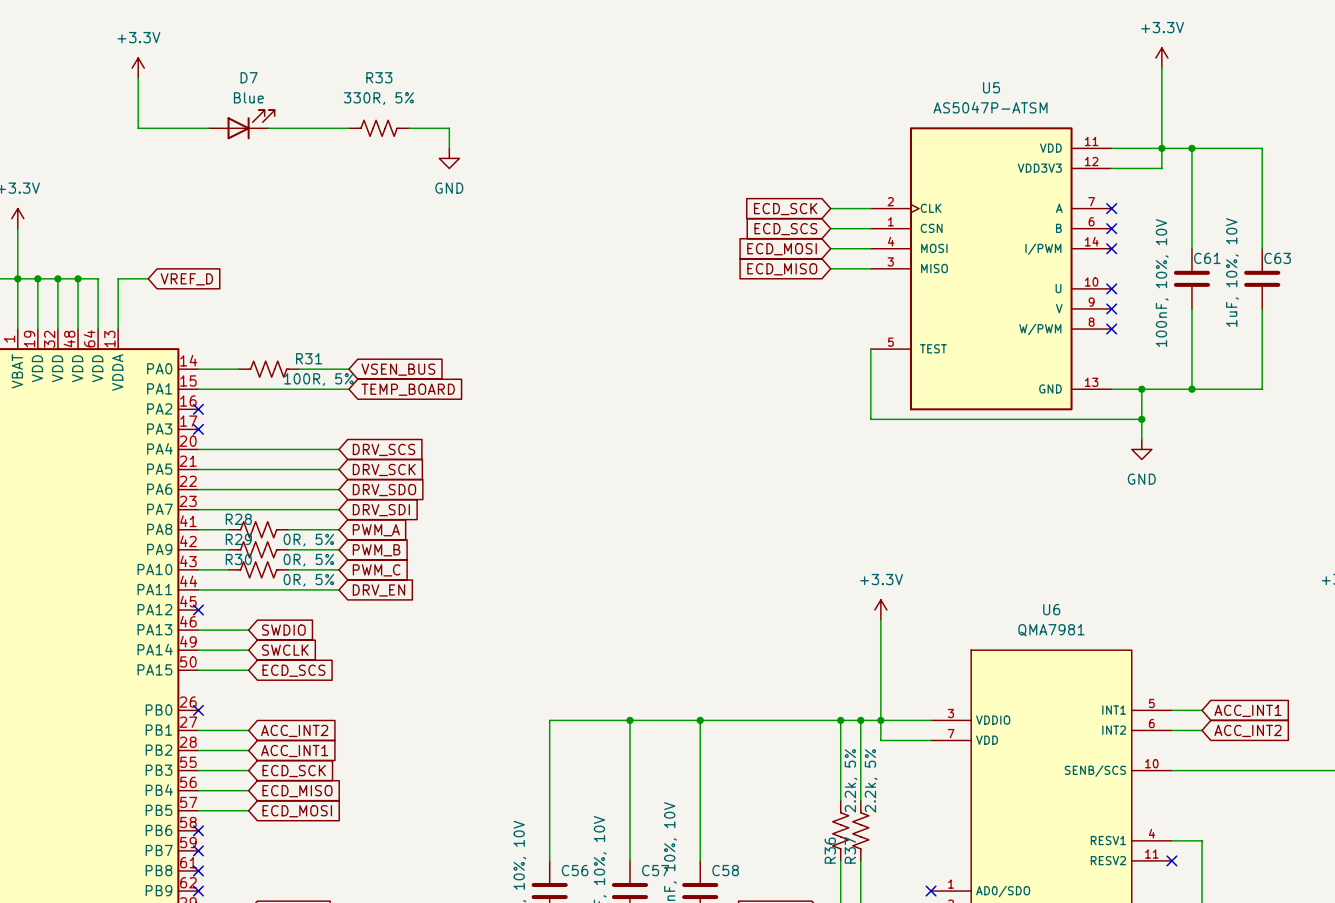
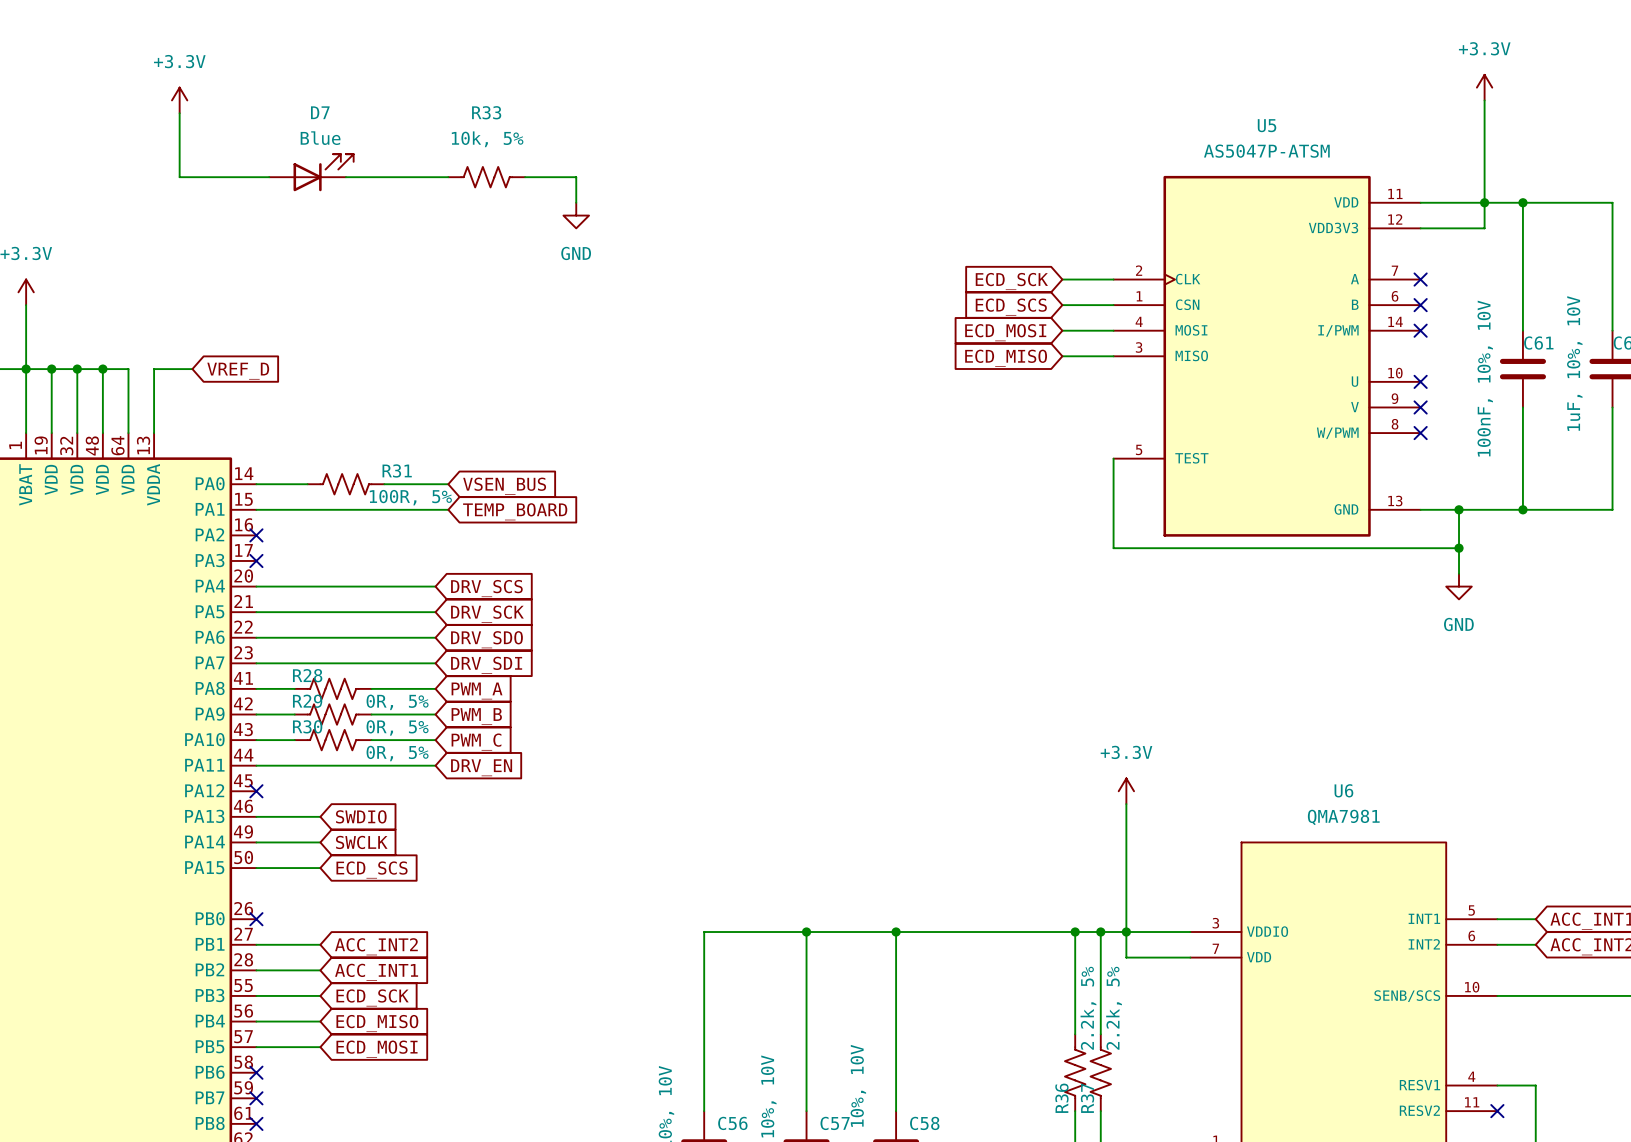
R33 value: 330R, 5% (378, 98) -> 10k, 5% (487, 139)

